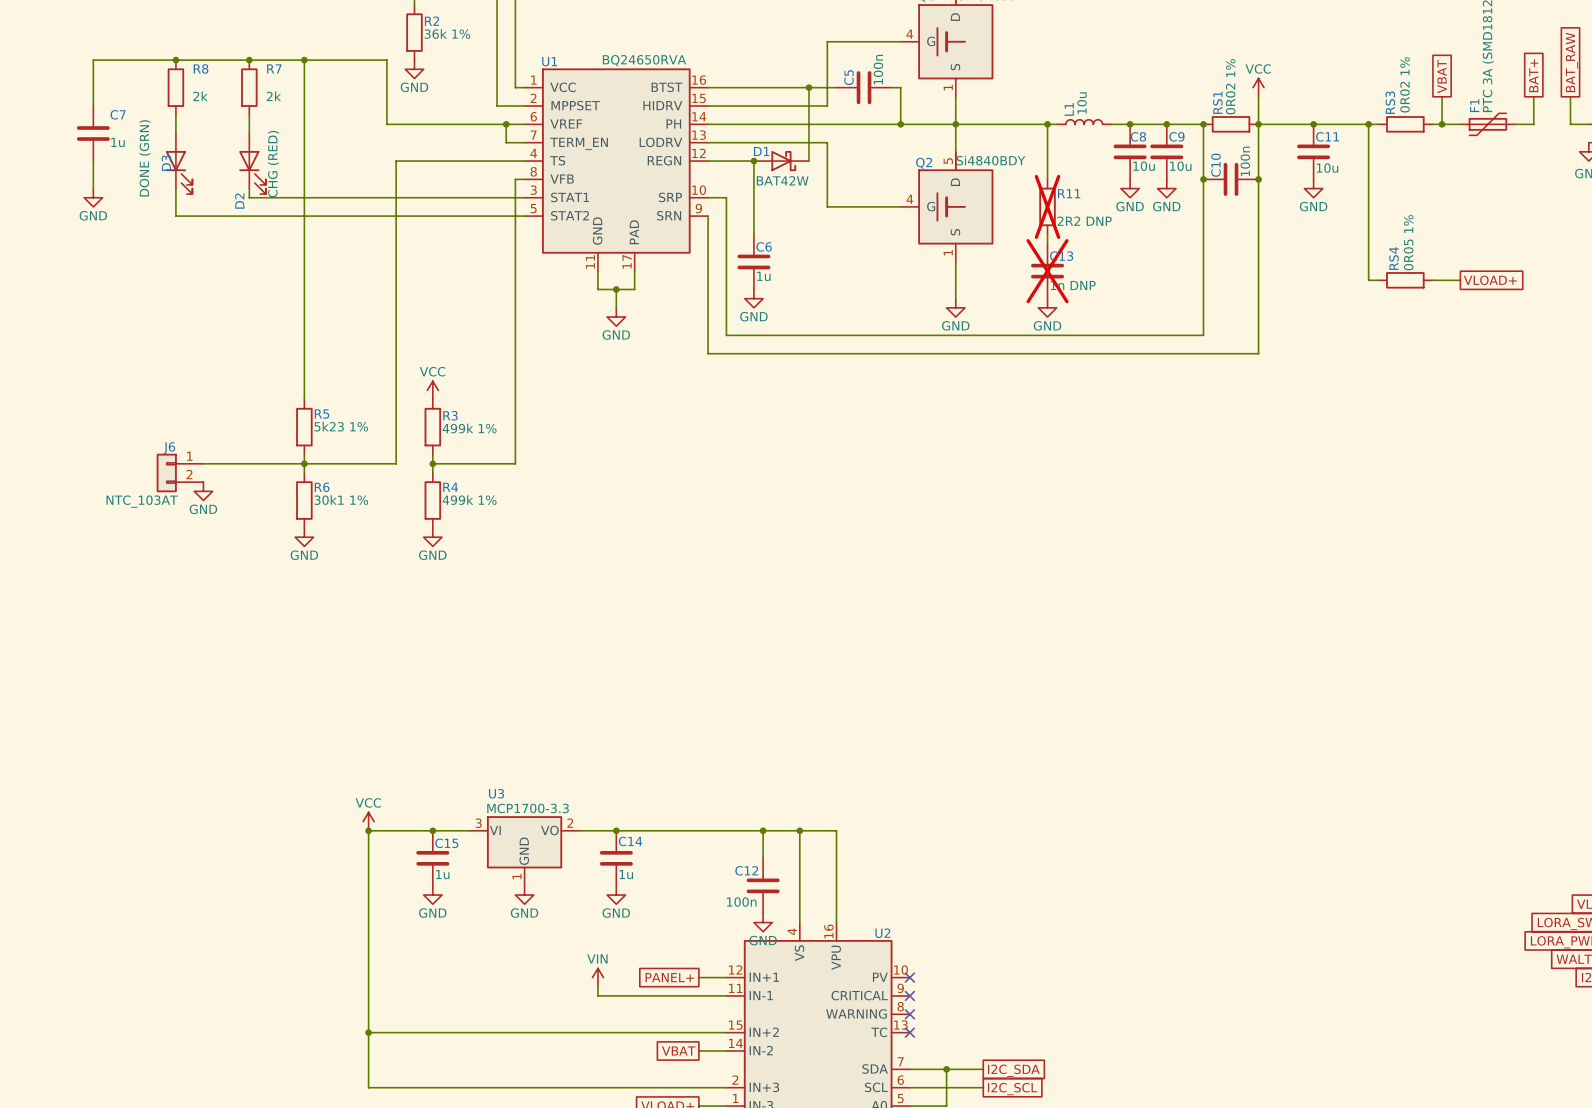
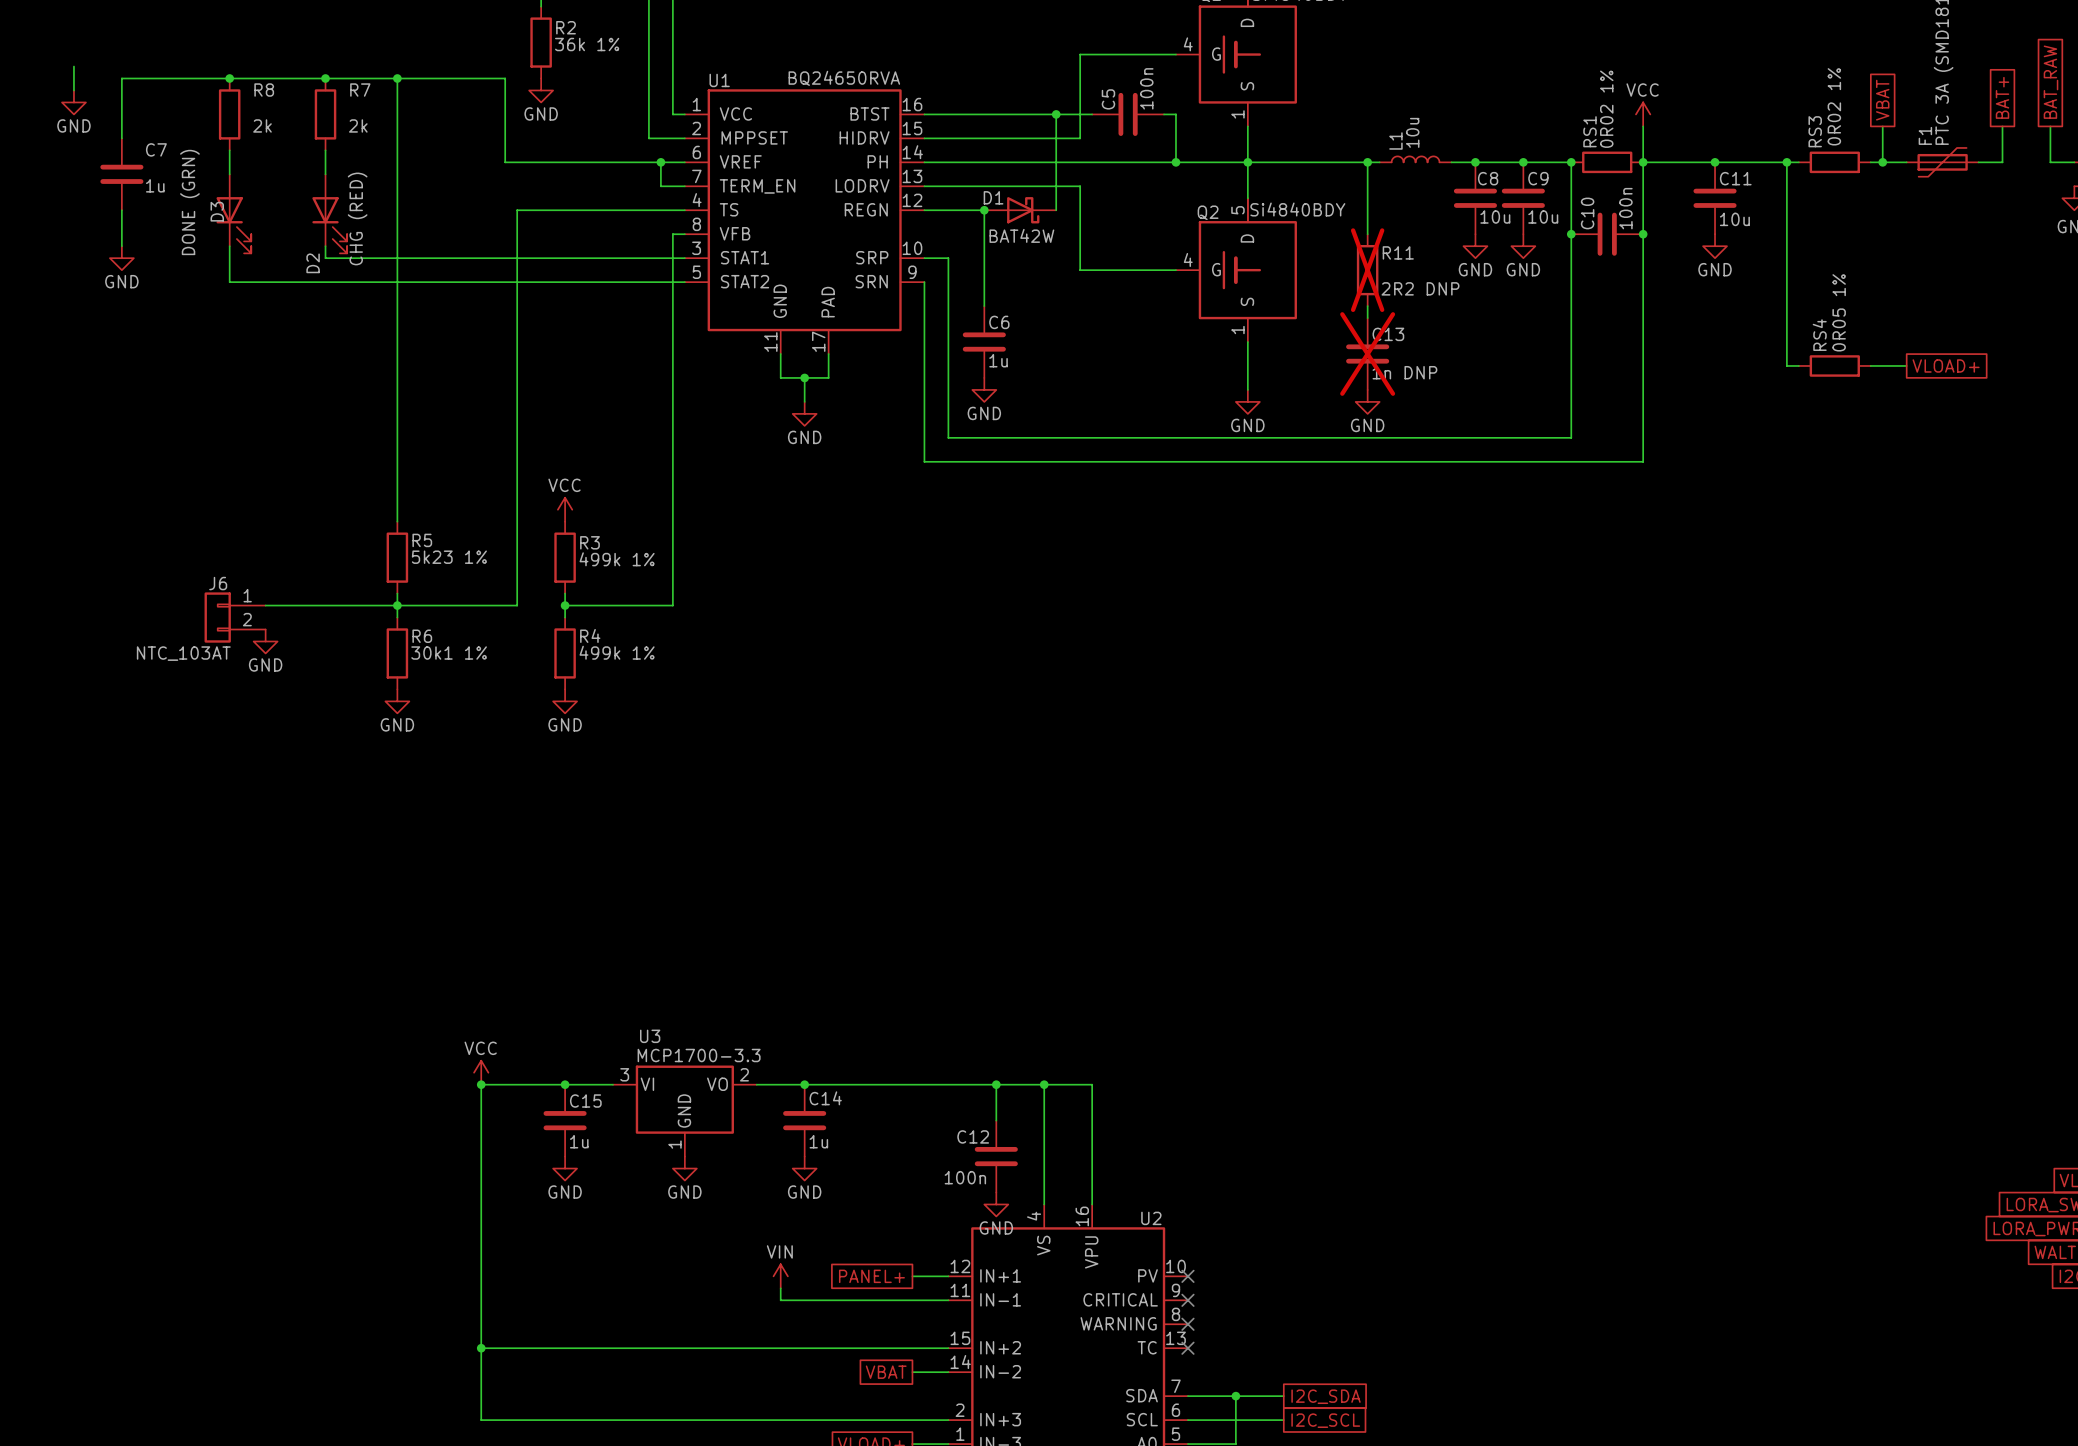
wire: none -> (73, 66) (73, 90)
power symbol: none -> GND (73, 102)

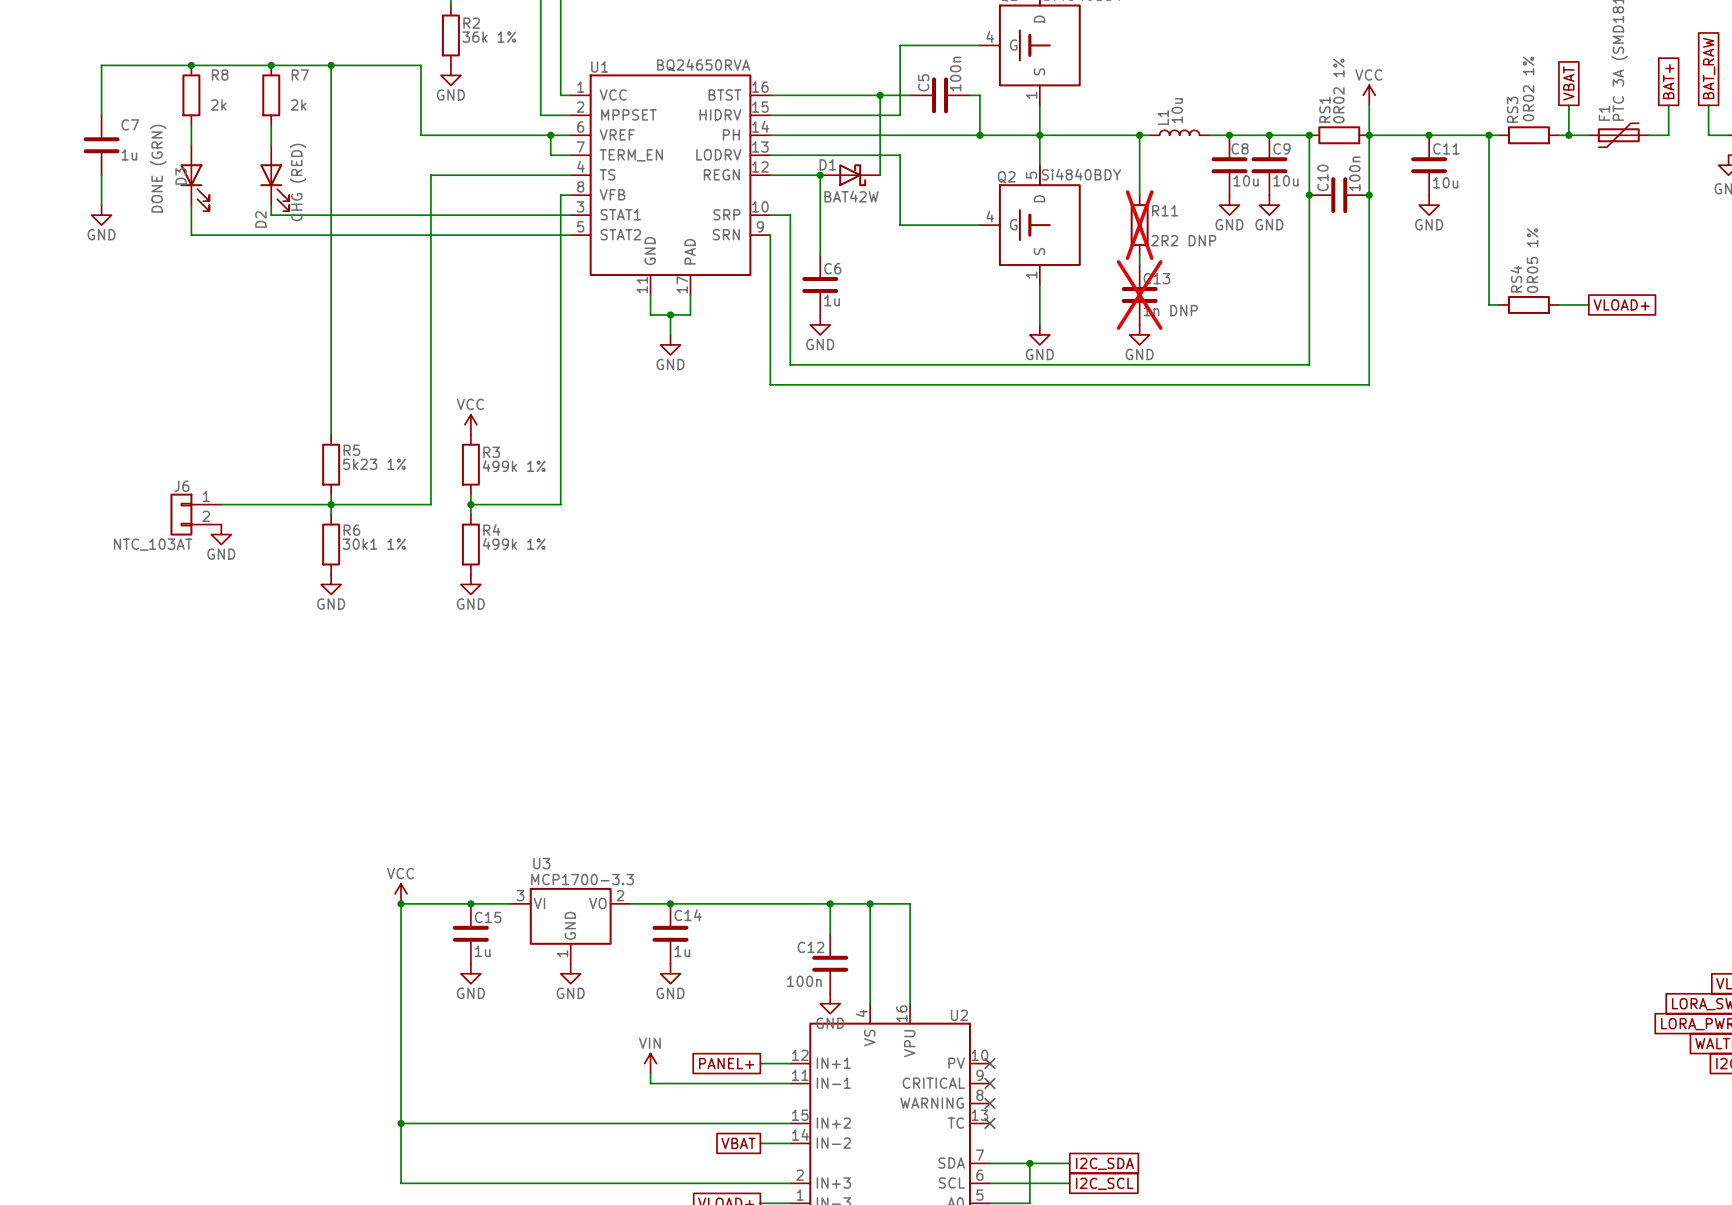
wire: (73, 66) (73, 90) -> none
power symbol: GND (73, 102) -> none

